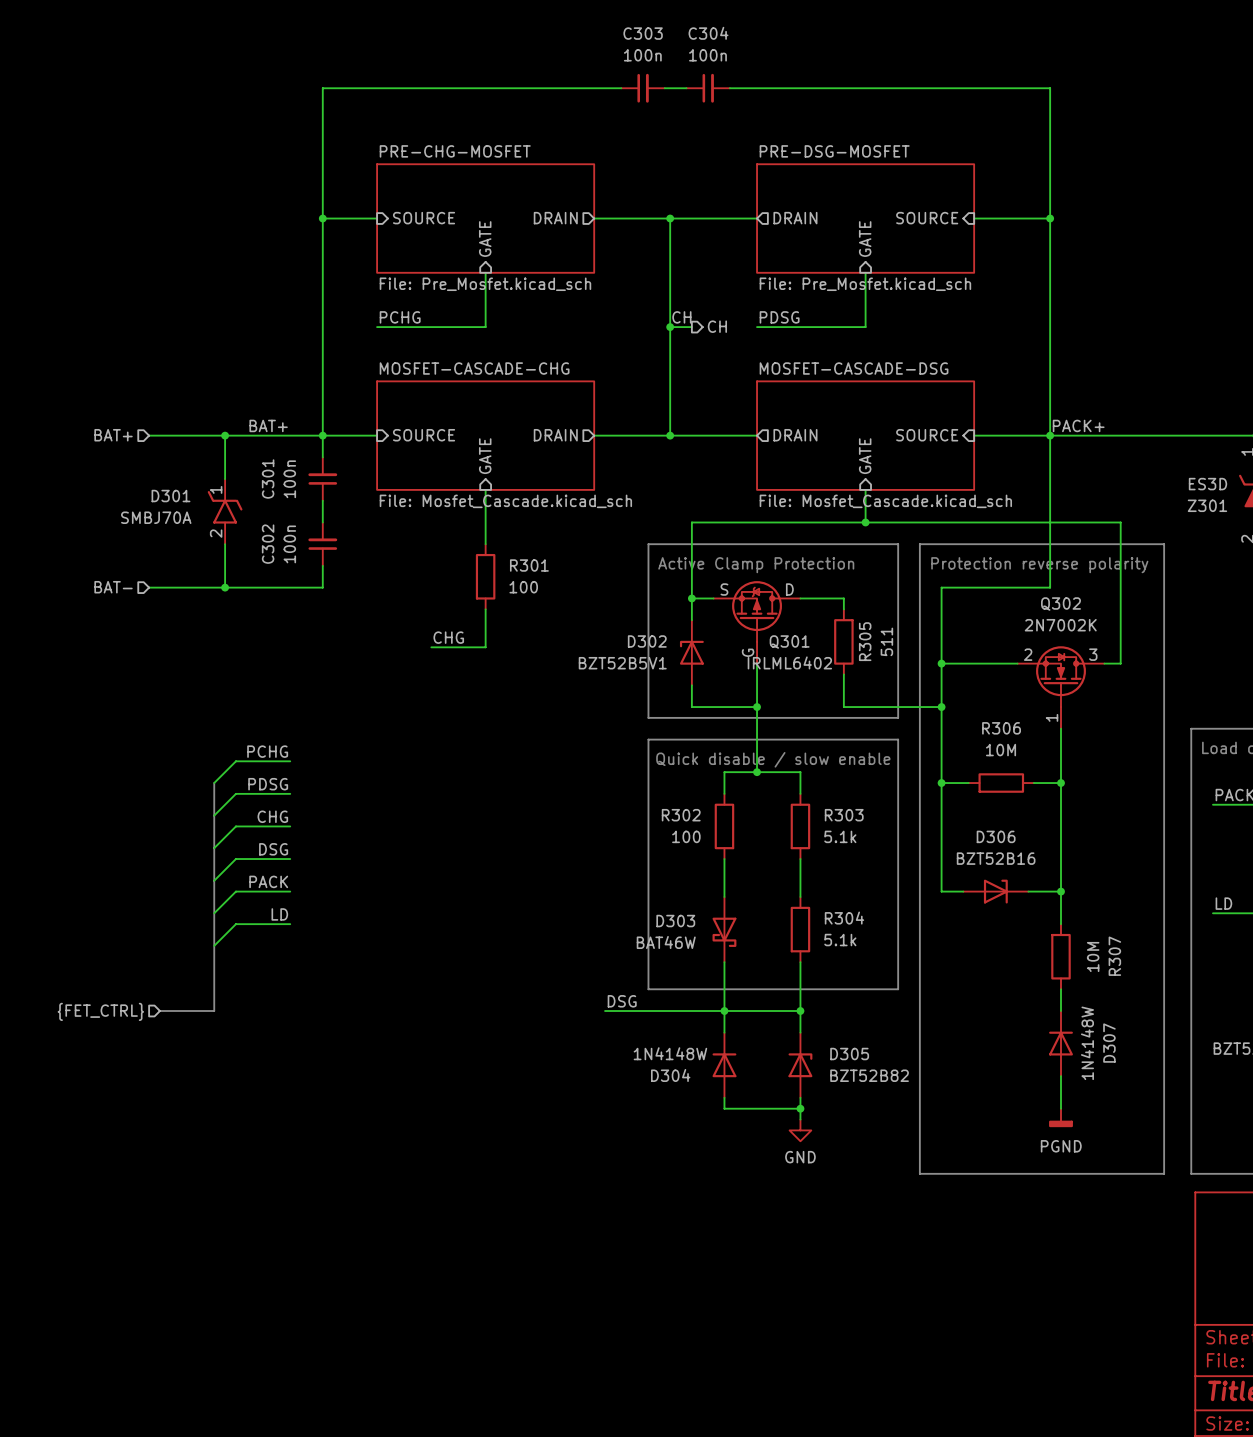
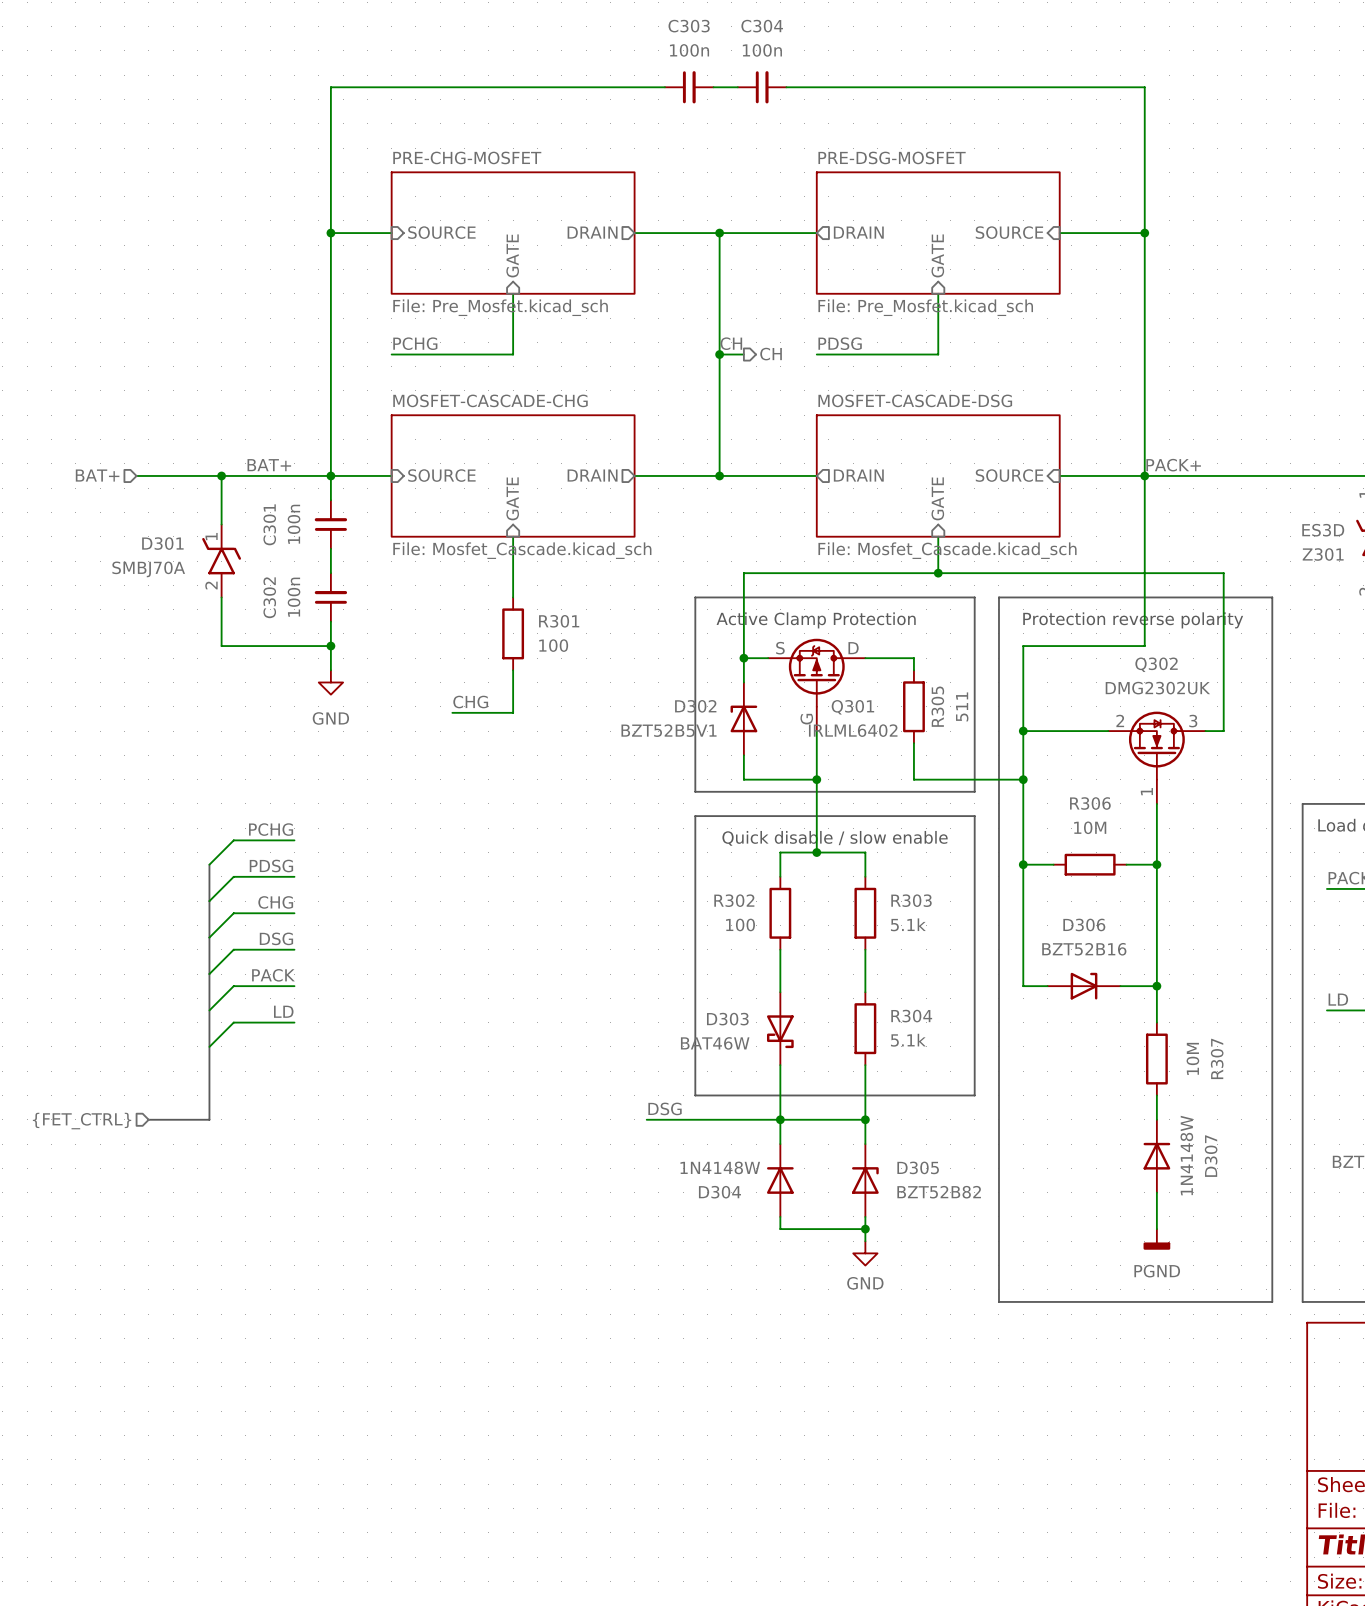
hierarchical label: BAT- (113, 587) -> none
wire: (149, 587) (225, 587) -> none
junction: (225, 587) -> none
wire: none -> (330, 646) (330, 670)
junction: none -> (330, 646)
power symbol: none -> GND (330, 682)
Q302 value: 2N7002K (1060, 625) -> DMG2302UK (1157, 688)

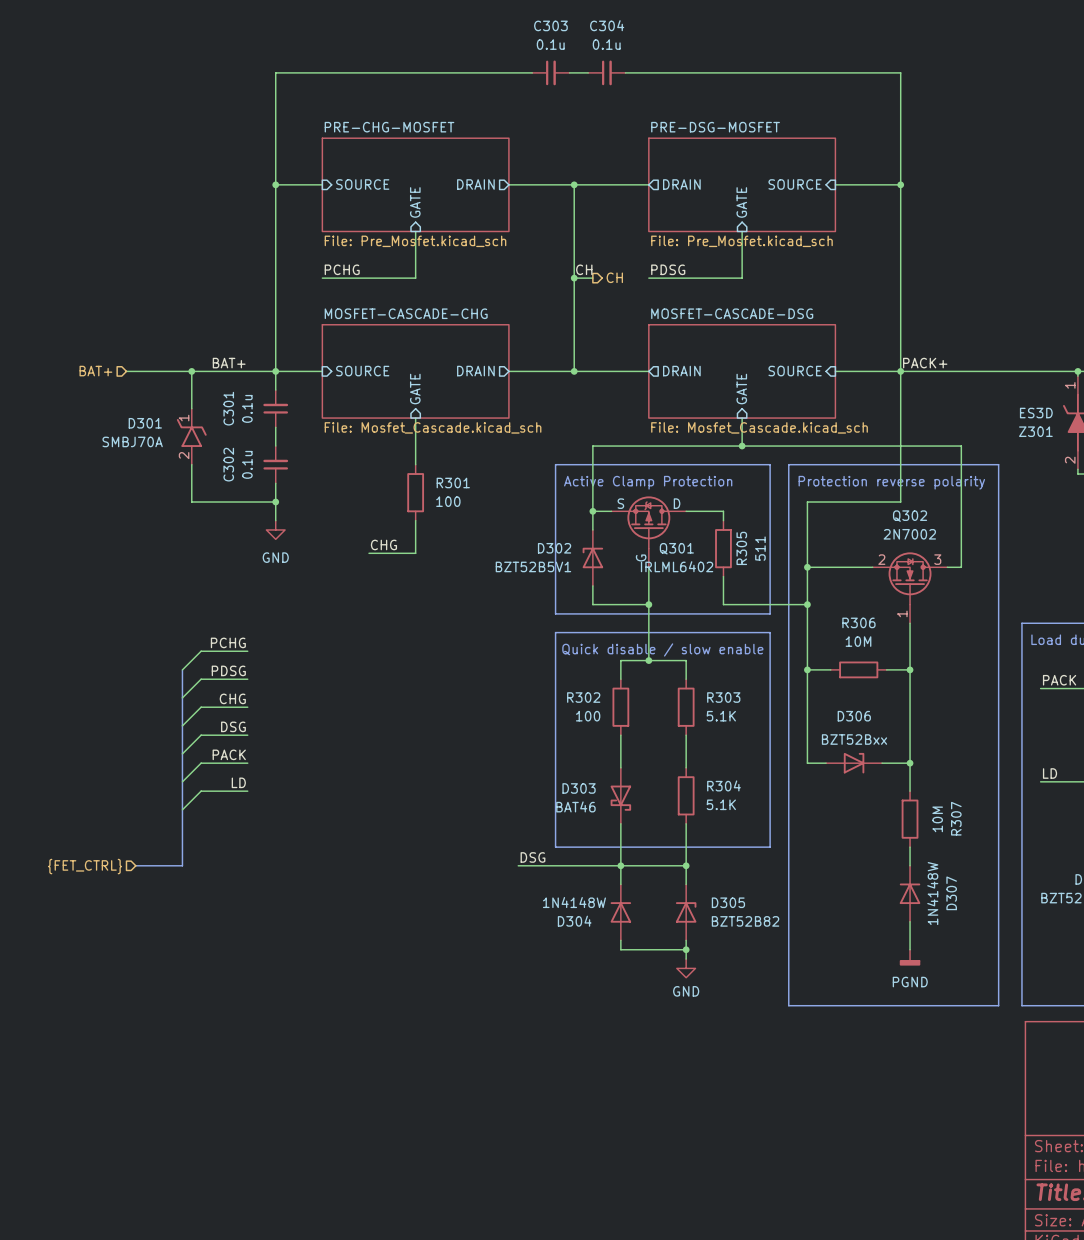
C303 value: 100n (689, 50) -> 0.1u (550, 44)
C304 value: 100n (762, 50) -> 0.1u (606, 44)
C301 value: 100n (294, 524) -> 0.1u (247, 408)
C302 value: 100n (294, 597) -> 0.1u (247, 464)
Q302 value: DMG2302UK (1157, 688) -> 2N7002 (909, 534)
R303 value: 5.1k (908, 924) -> 5.1K (721, 716)
D306 value: BZT52B16 (1084, 949) -> BZT52Bxx (854, 739)
R304 value: 5.1k (908, 1040) -> 5.1K (721, 804)
D303 value: BAT46W (715, 1043) -> BAT46 (575, 806)

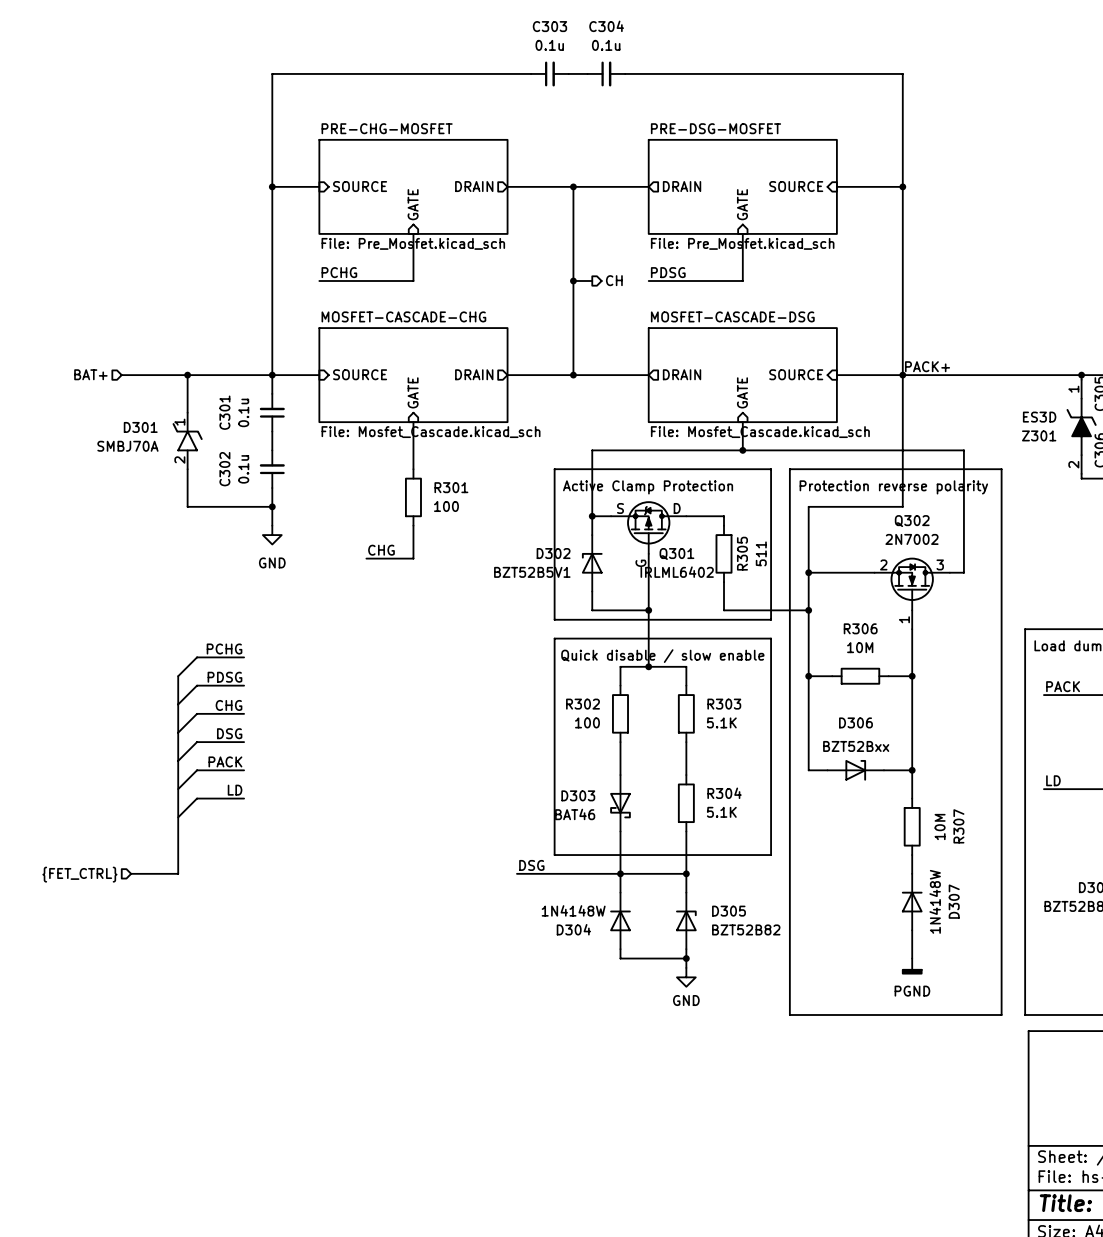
label: CH (584, 269) -> none
label: BAT+ (229, 363) -> none

